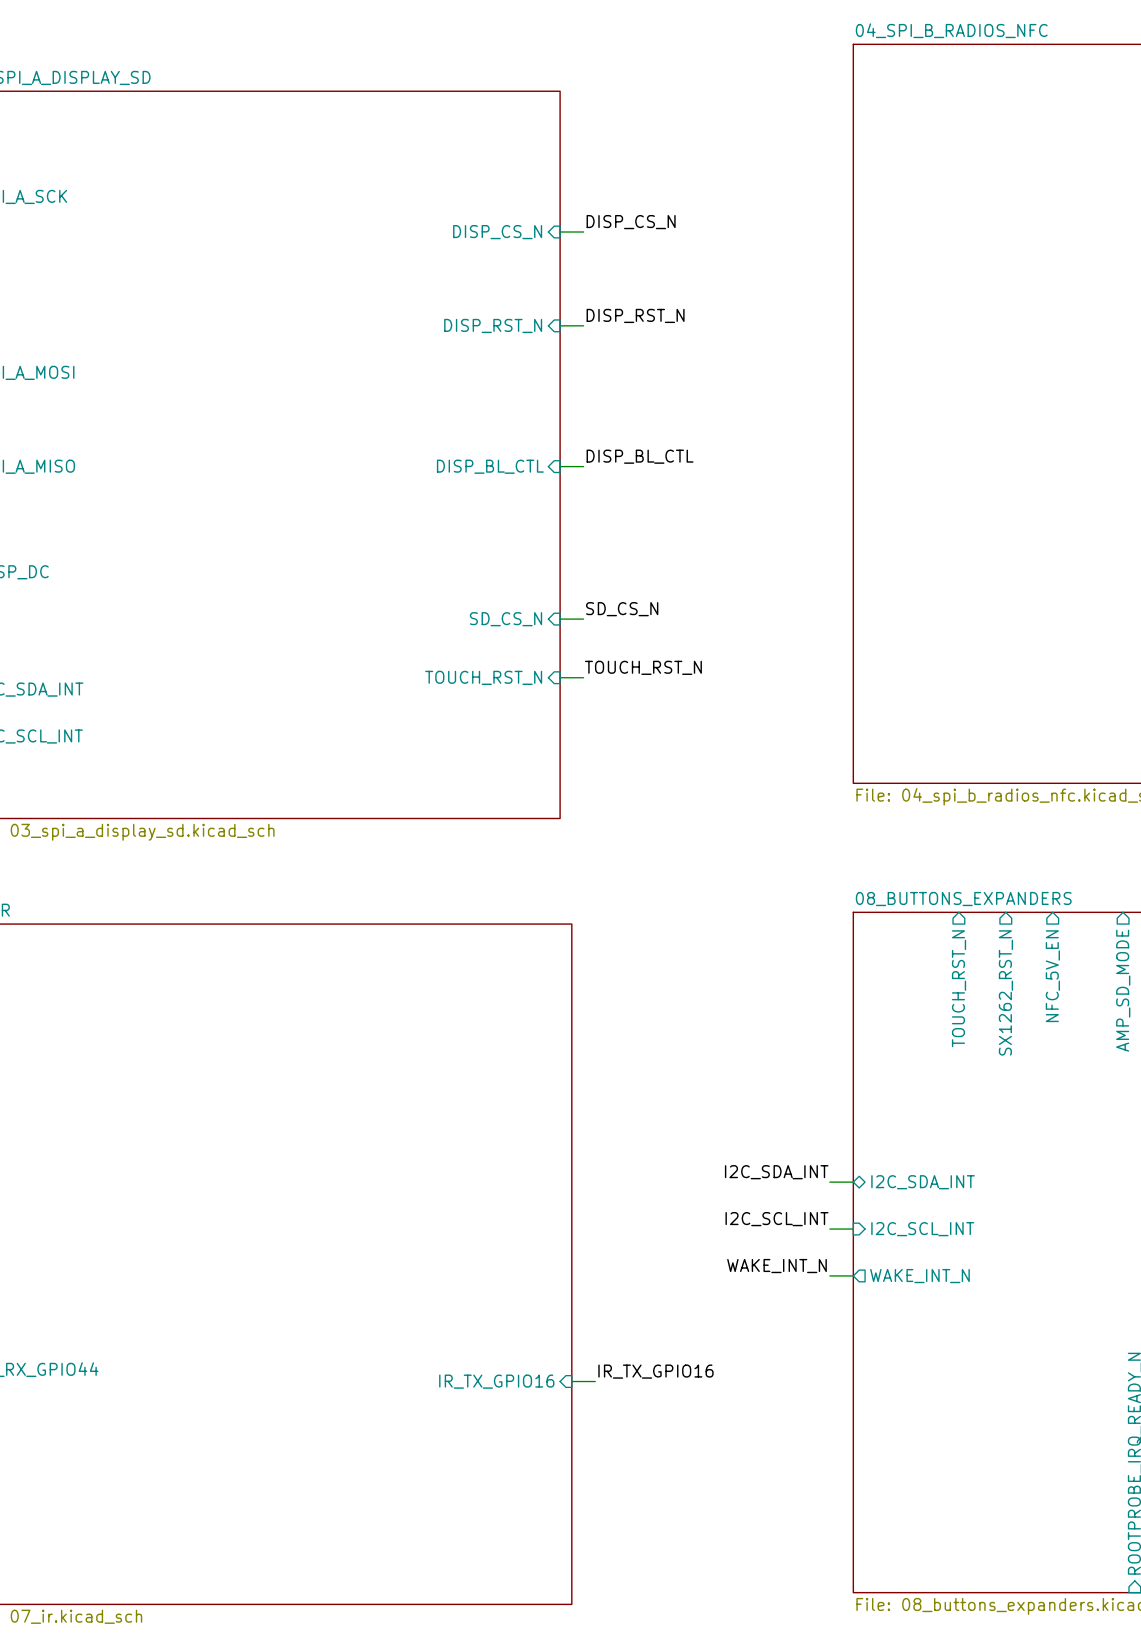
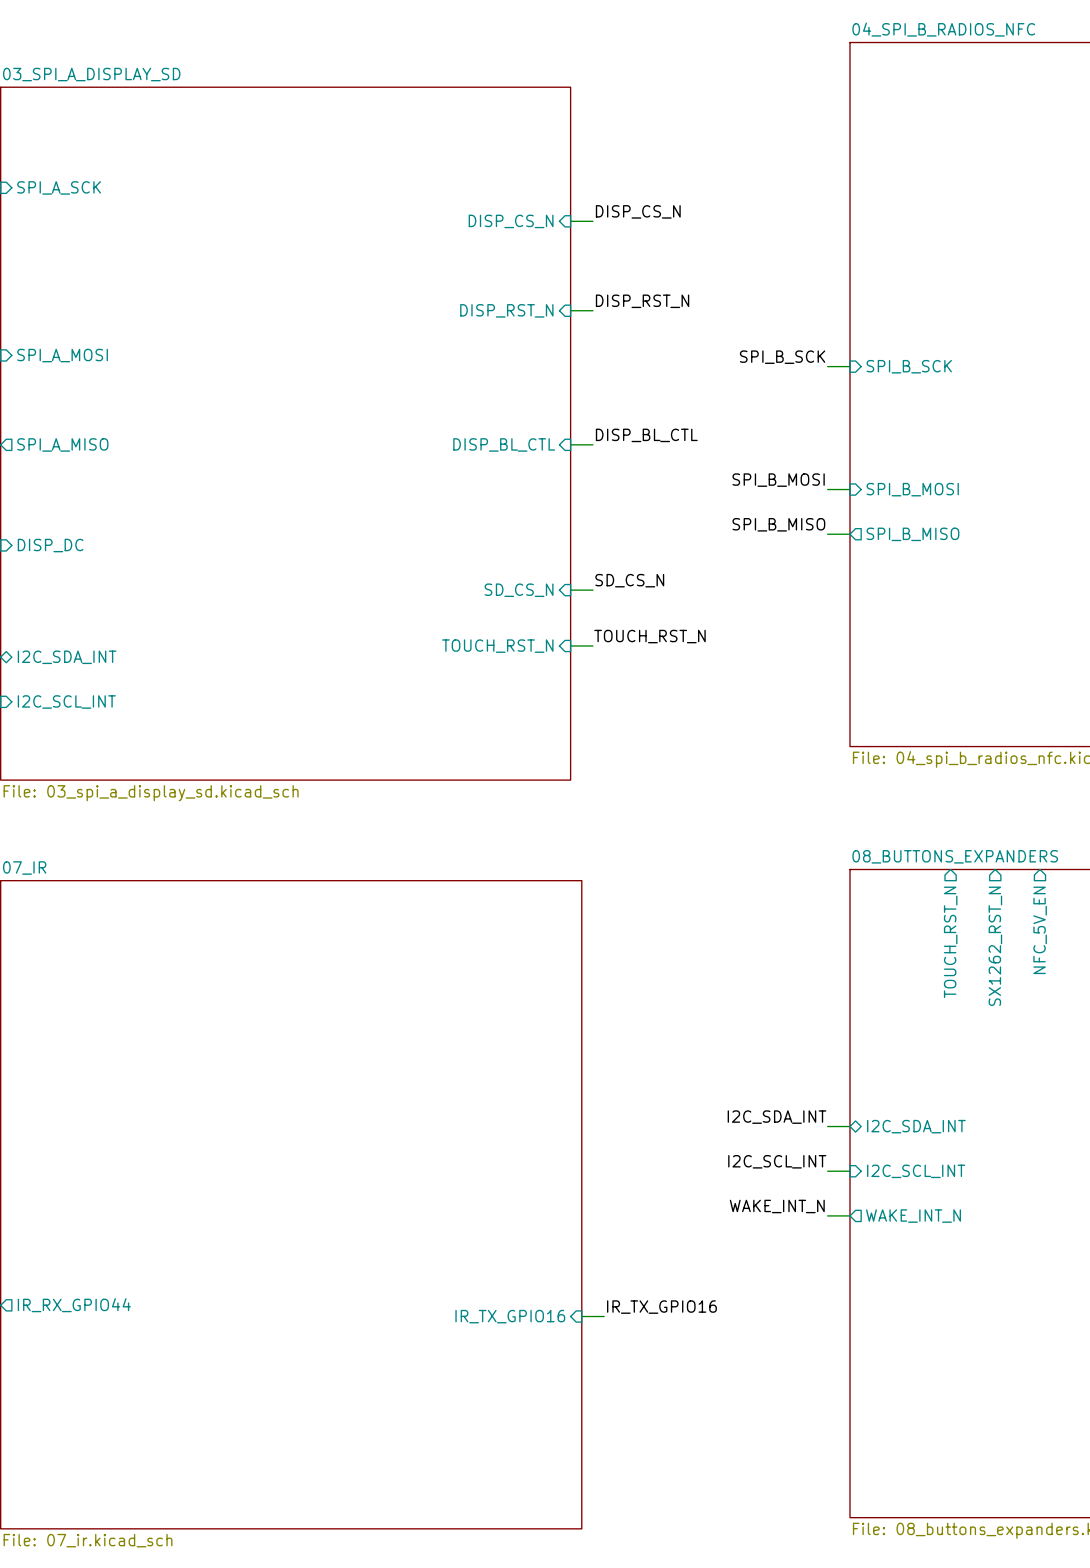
label: none -> SPI_B_SCK (782, 357)
wire: none -> (827, 366) (850, 366)
sheet pin: none -> SPI_B_SCK (909, 366)
label: none -> SPI_B_MOSI (778, 480)
wire: none -> (827, 489) (850, 489)
sheet pin: none -> SPI_B_MOSI (912, 489)
label: none -> SPI_B_MISO (778, 524)
wire: none -> (827, 534) (850, 534)
sheet pin: none -> SPI_B_MISO (912, 534)

